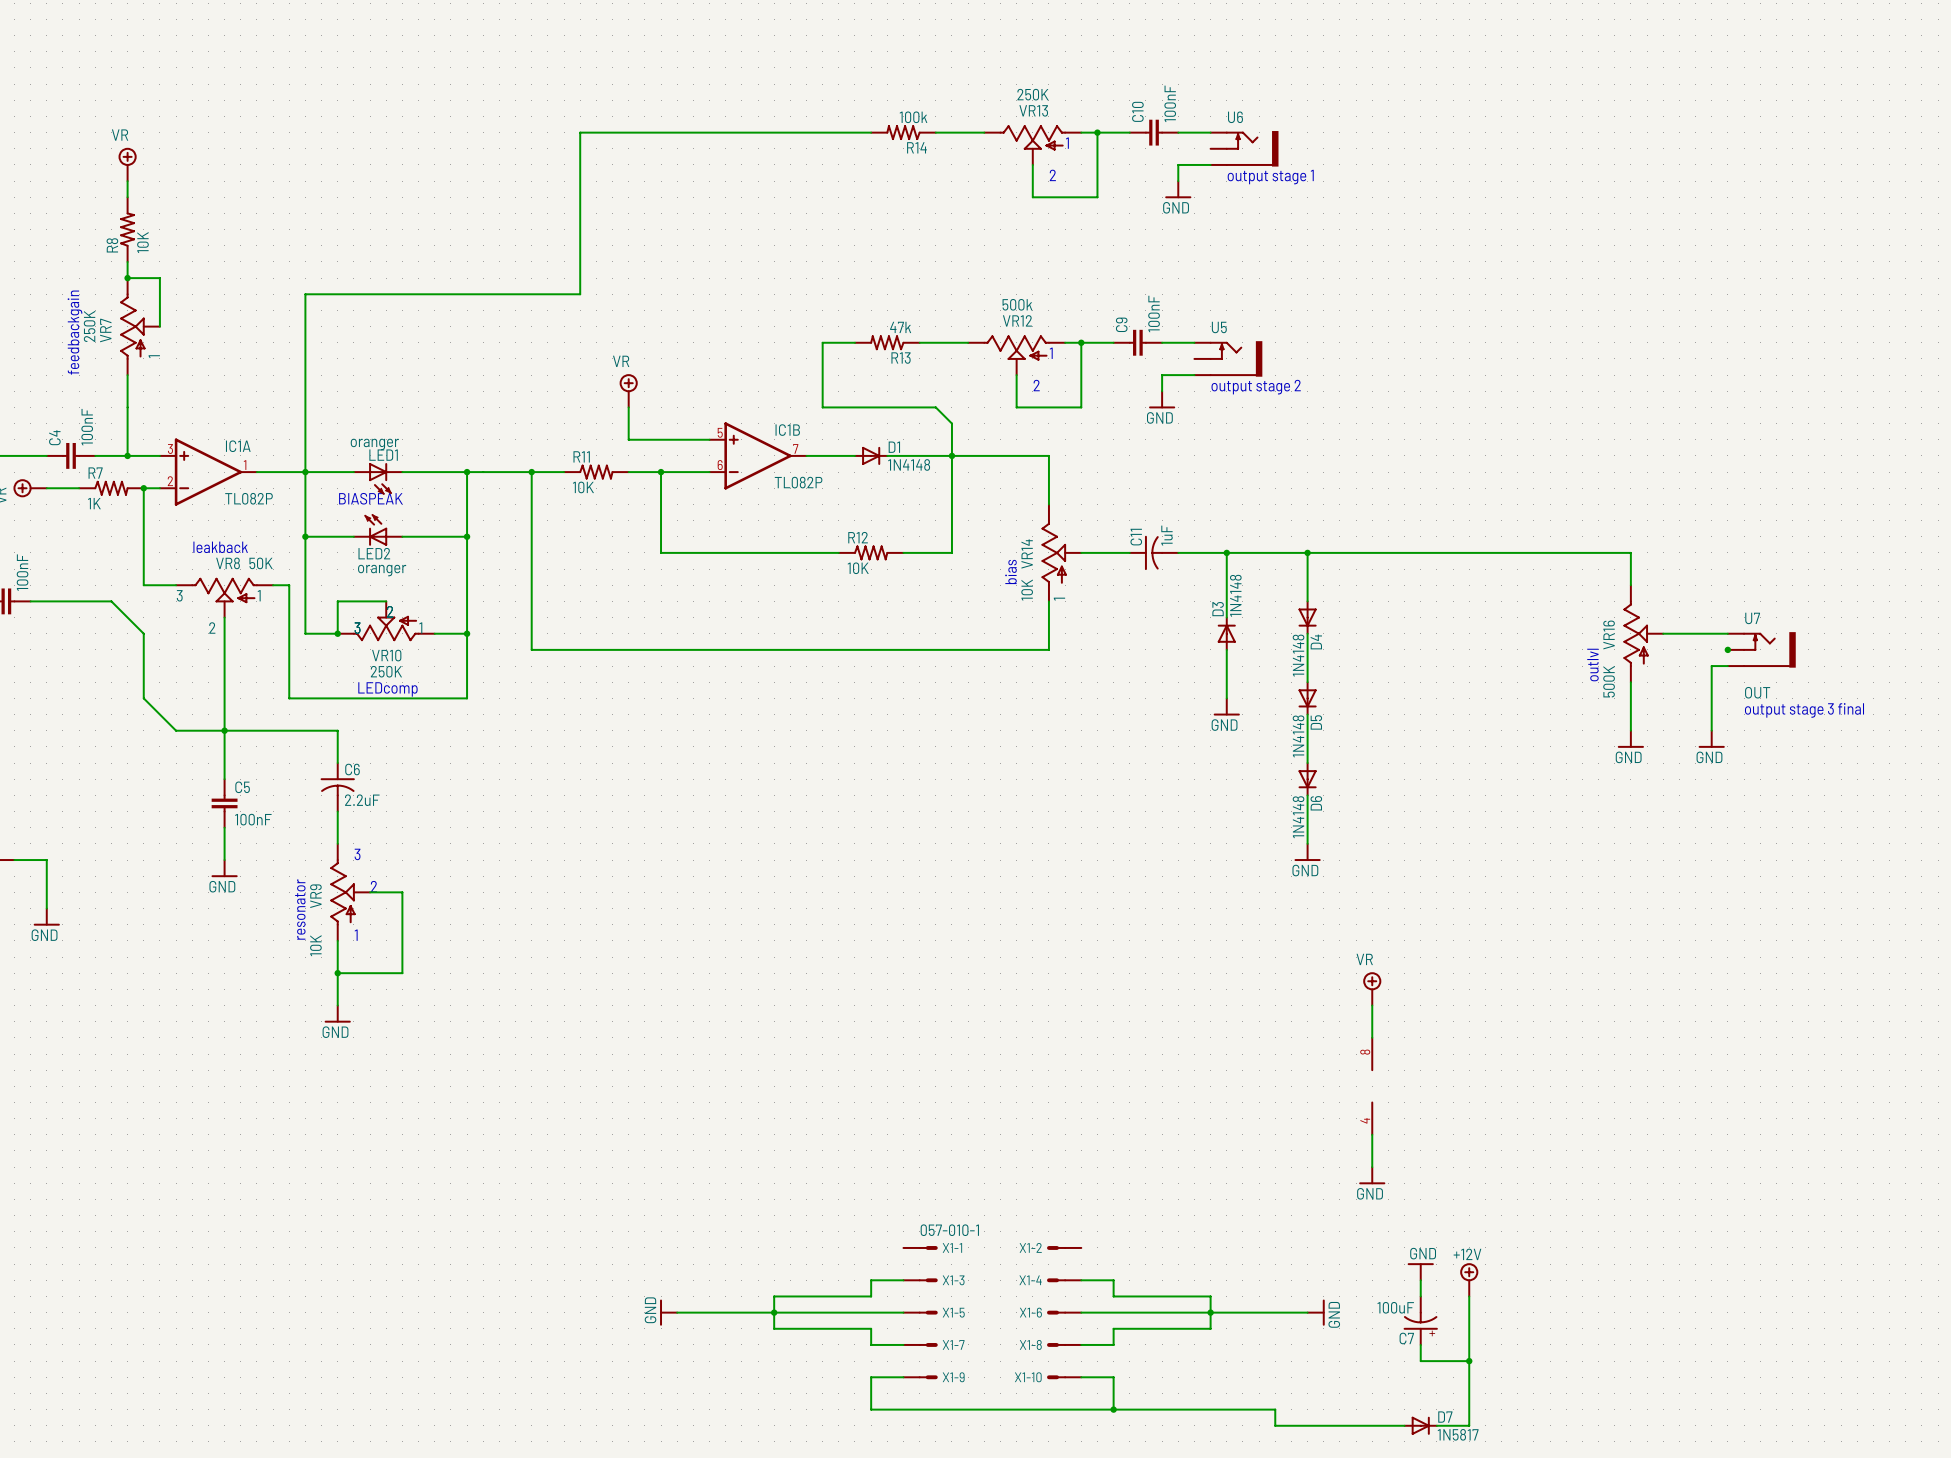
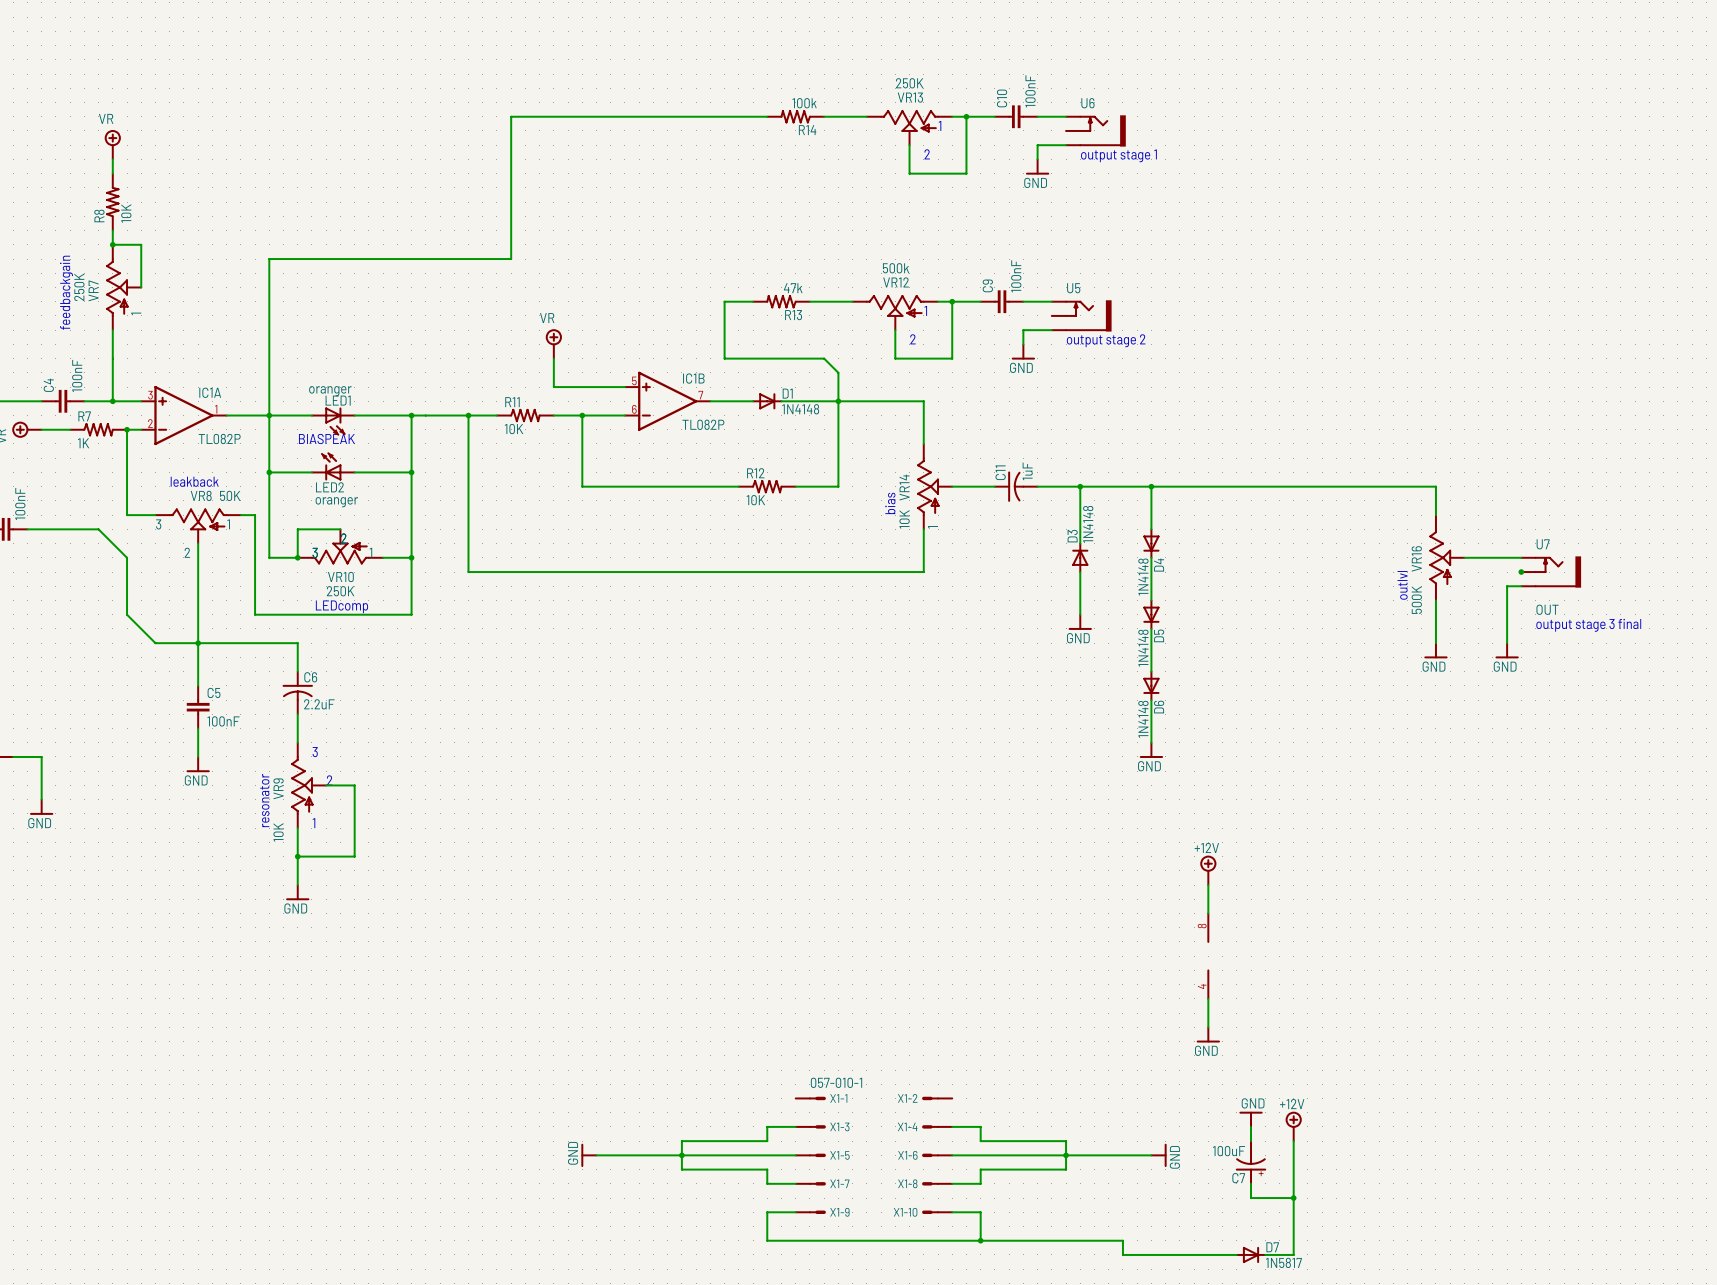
power symbol: VR (1372, 988) -> +12V (1208, 870)

